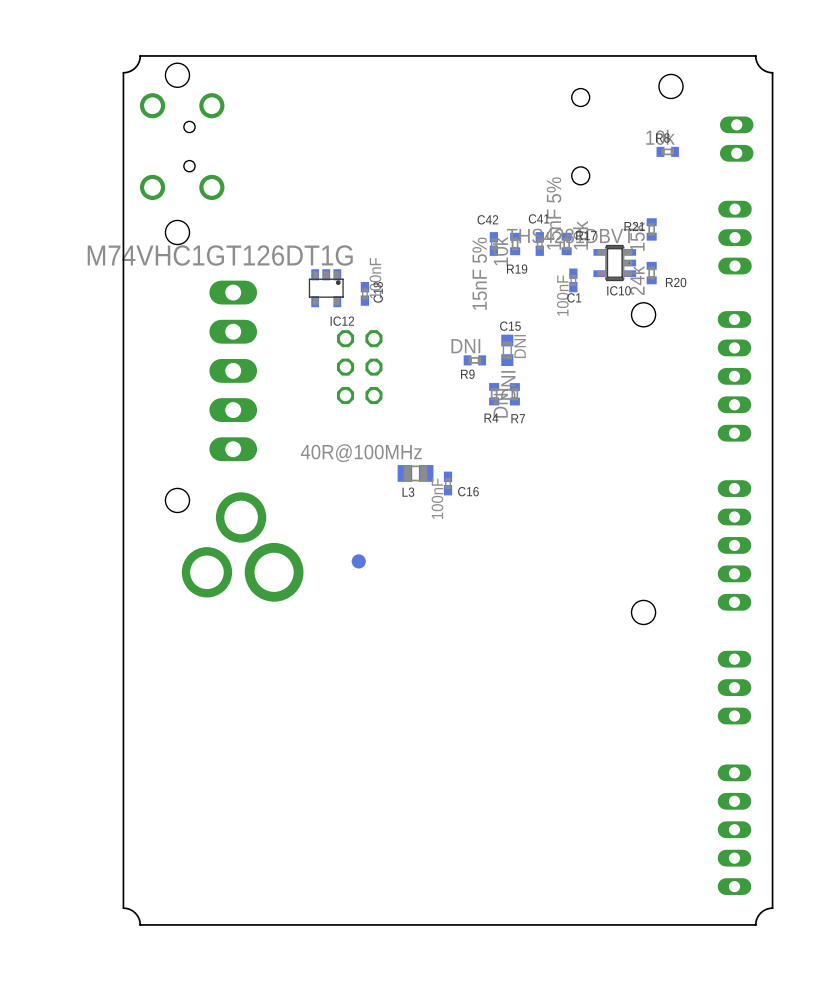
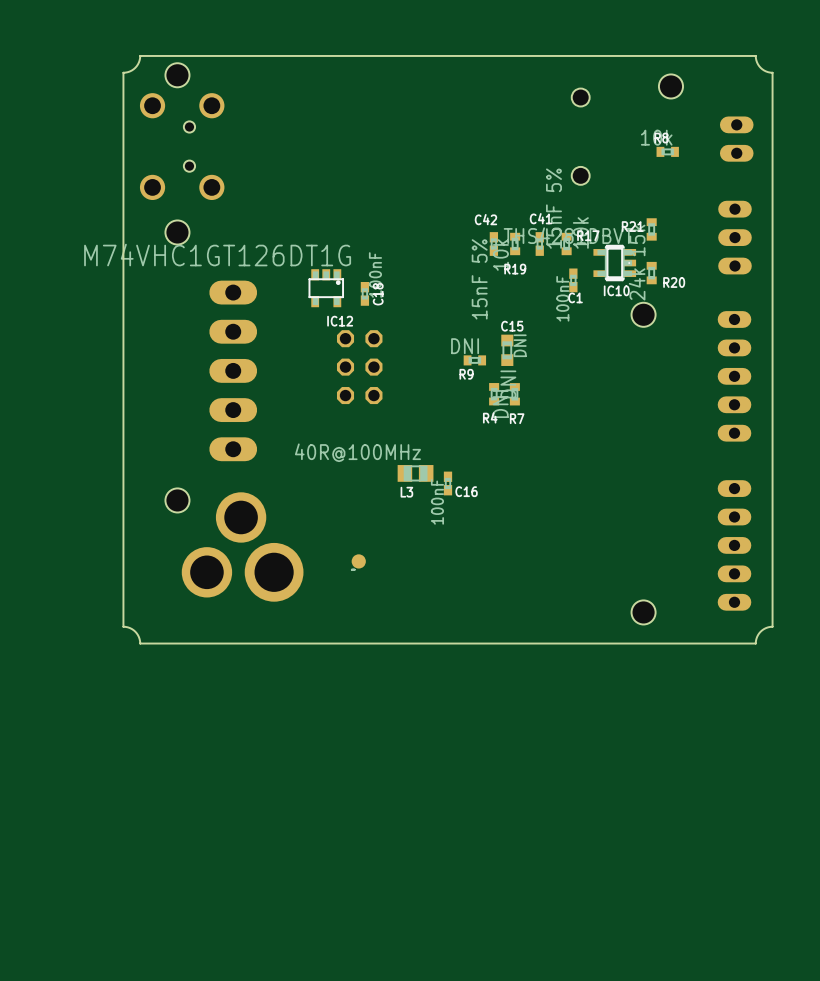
board edge: (772, 626) (772, 908) (760, 913) (755, 924) (140, 924) (135, 913) (123, 908) (123, 626) -> (772, 626) (760, 631) (755, 643) (140, 643) (135, 631) (123, 626)
part: (734, 687) -> none
part: (734, 829) -> none

